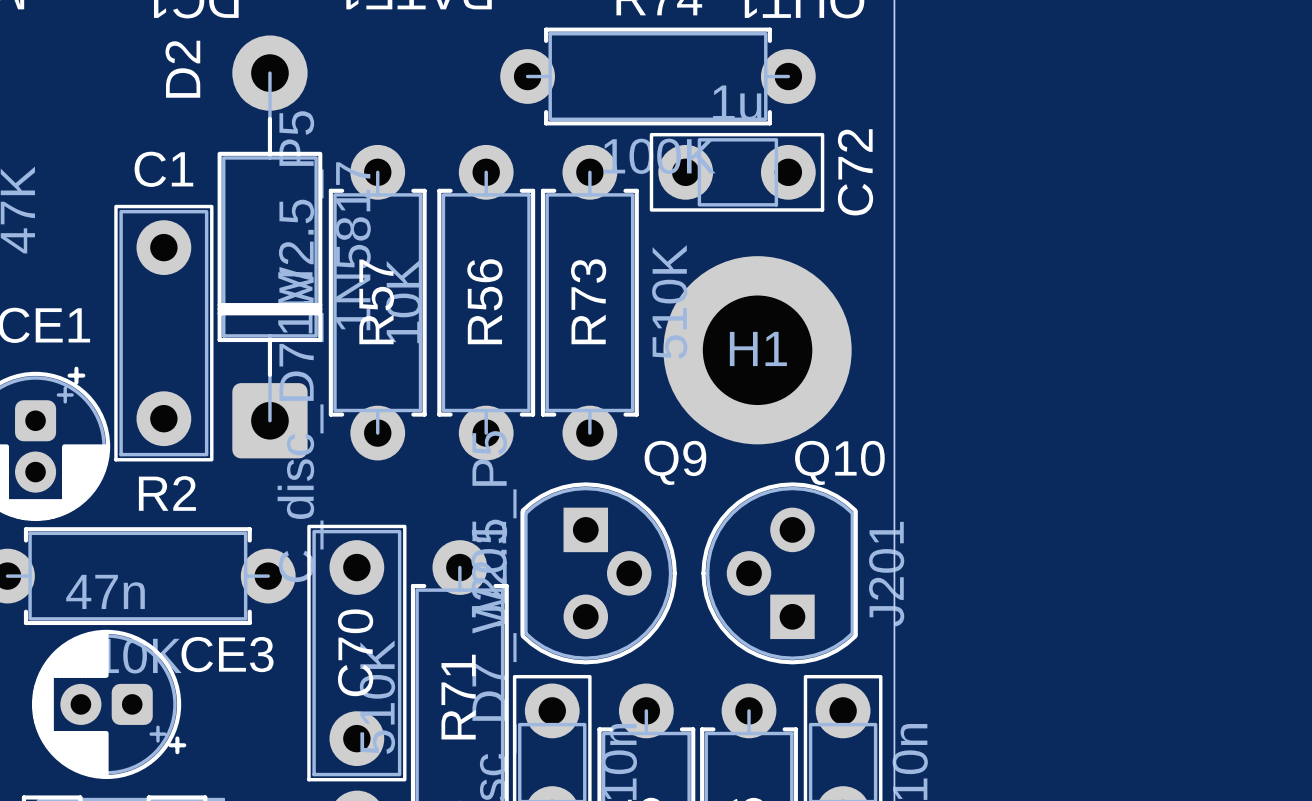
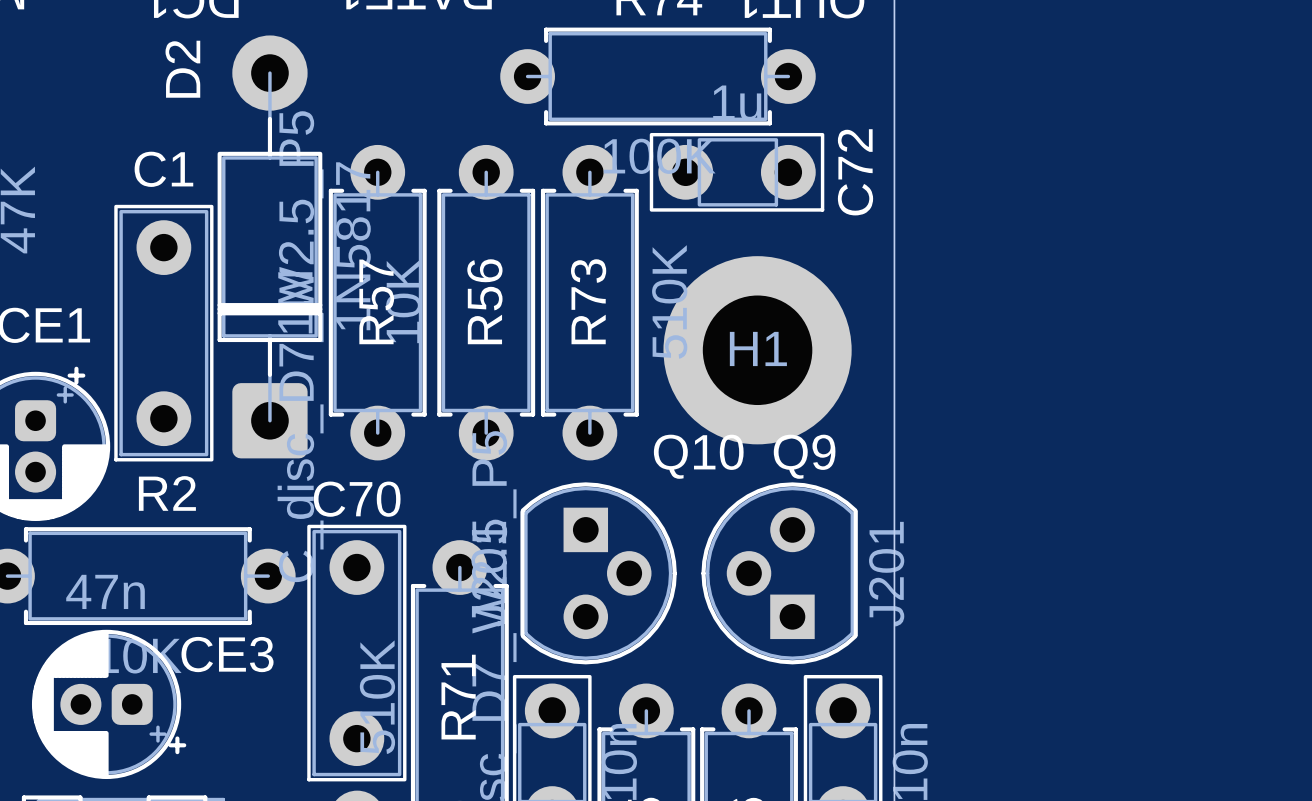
Q9 name position: Q9 (675, 462) -> Q9 (804, 456)
Q10 name position: Q10 (839, 462) -> Q10 (698, 456)
C70 name rotation: 0° (355, 652) -> 90° clockwise (357, 499)
C70 name position: C70 (355, 652) -> C70 (357, 499)

